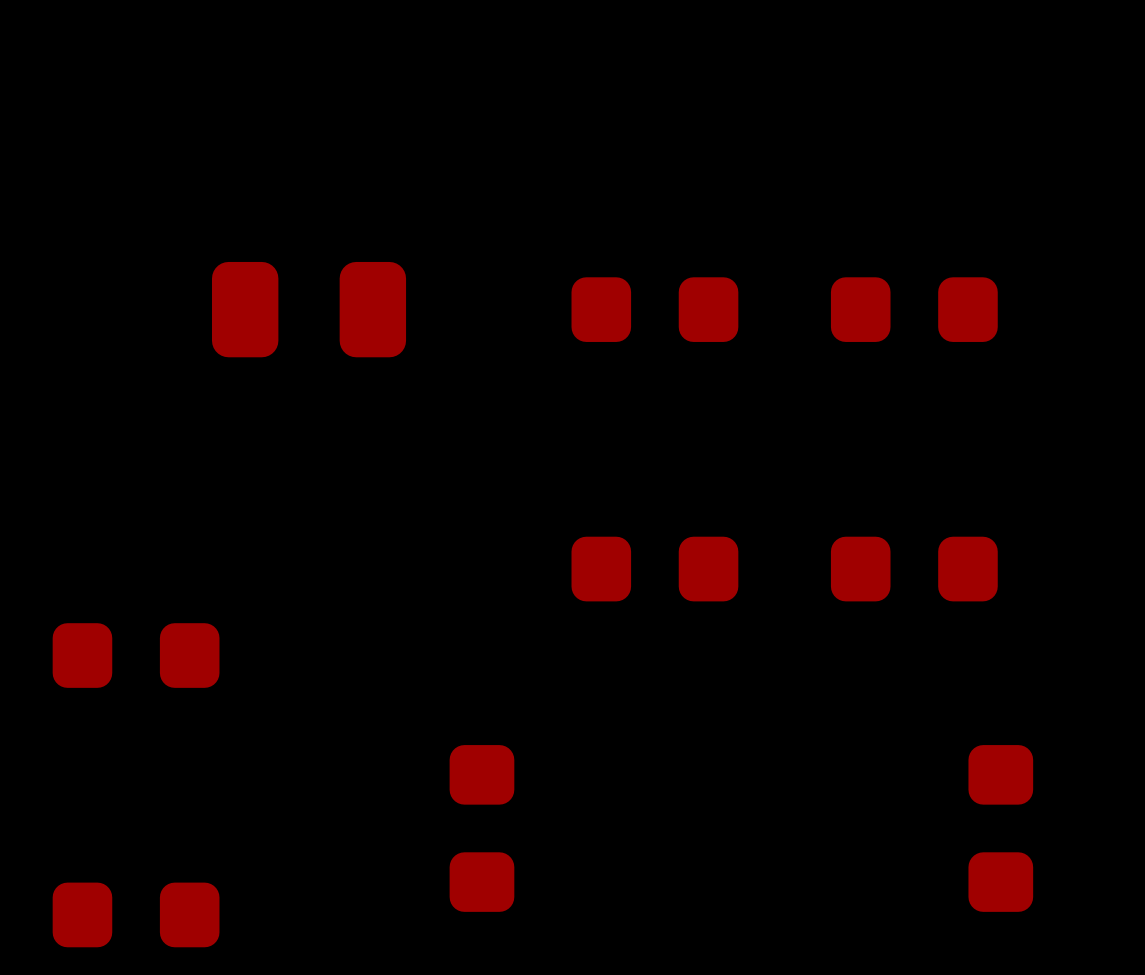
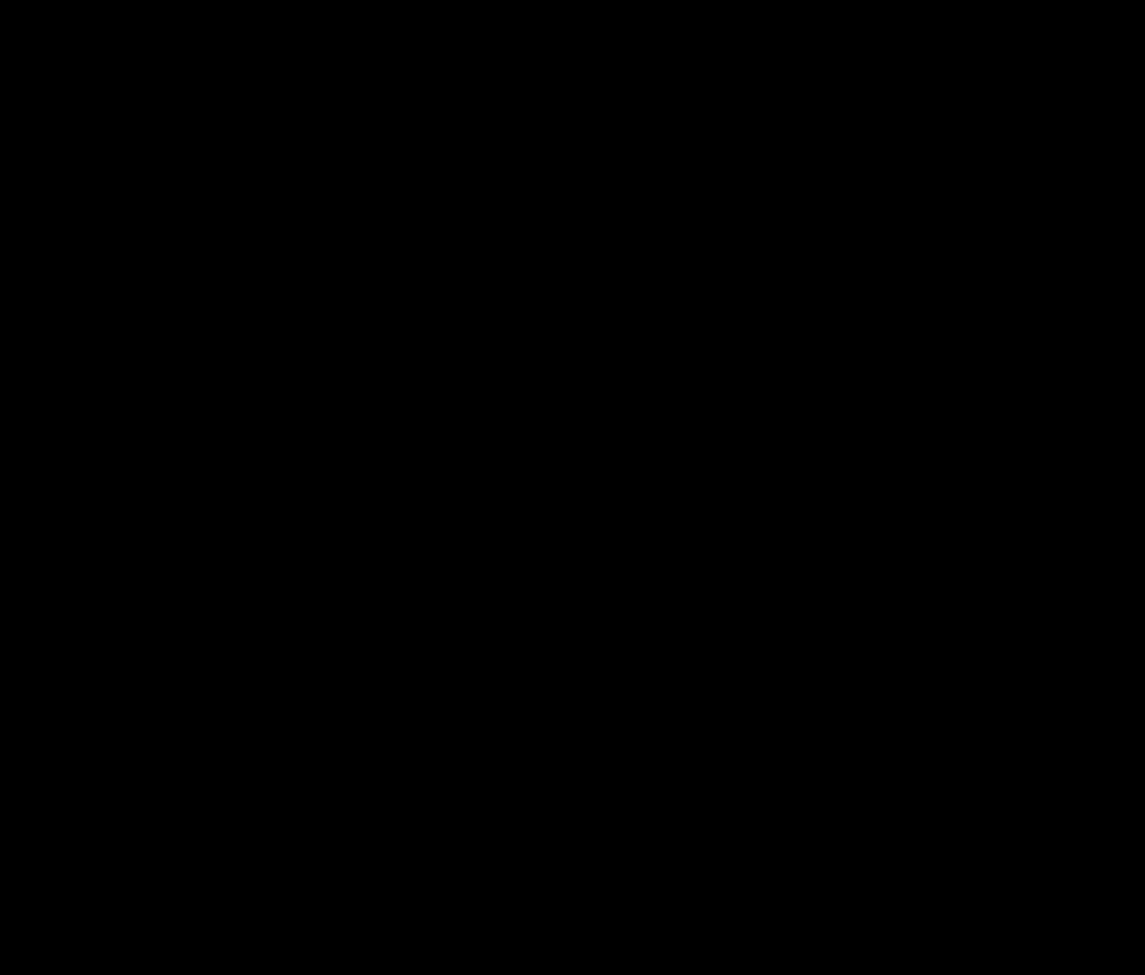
part: (309, 309) -> none
part: (654, 309) -> none
part: (914, 309) -> none
part: (654, 569) -> none
part: (914, 569) -> none
part: (136, 655) -> none
part: (481, 828) -> none
part: (1000, 828) -> none
part: (136, 914) -> none

